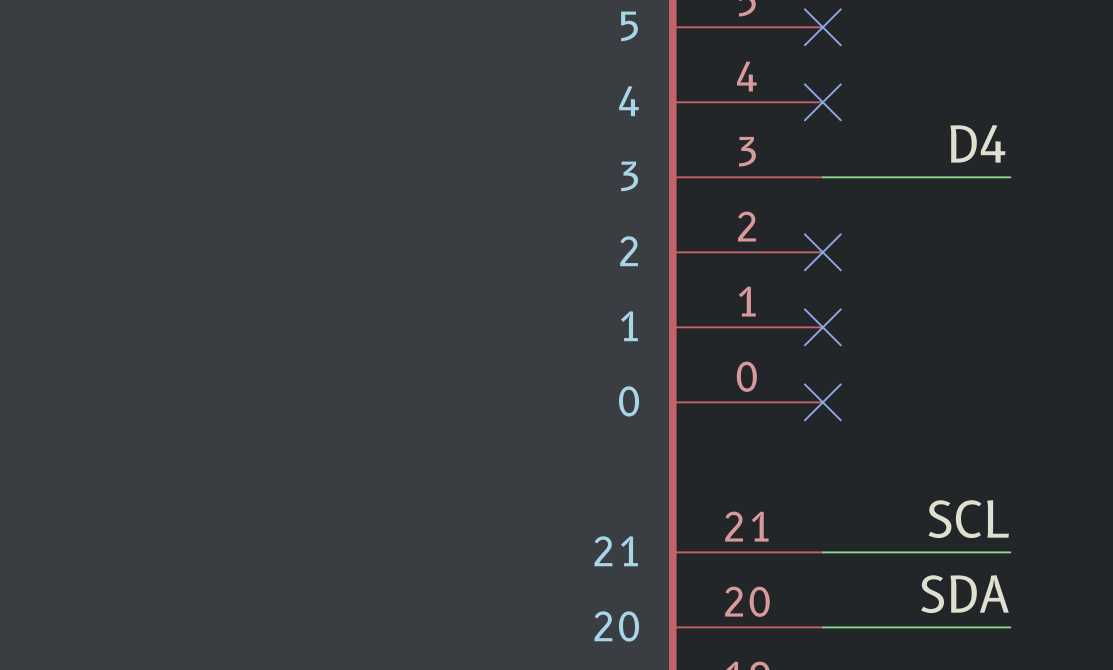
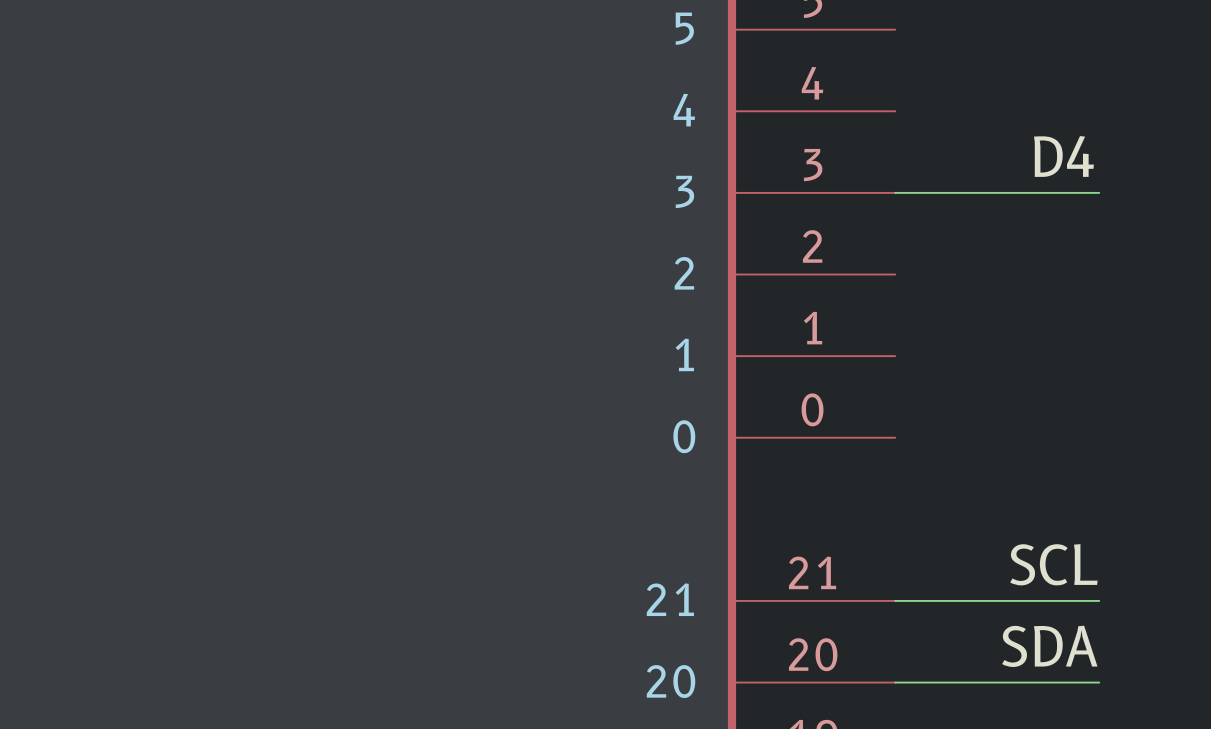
no-connect mark: (822, 27) -> none
no-connect mark: (822, 102) -> none
no-connect mark: (822, 252) -> none
no-connect mark: (822, 327) -> none
no-connect mark: (822, 402) -> none

